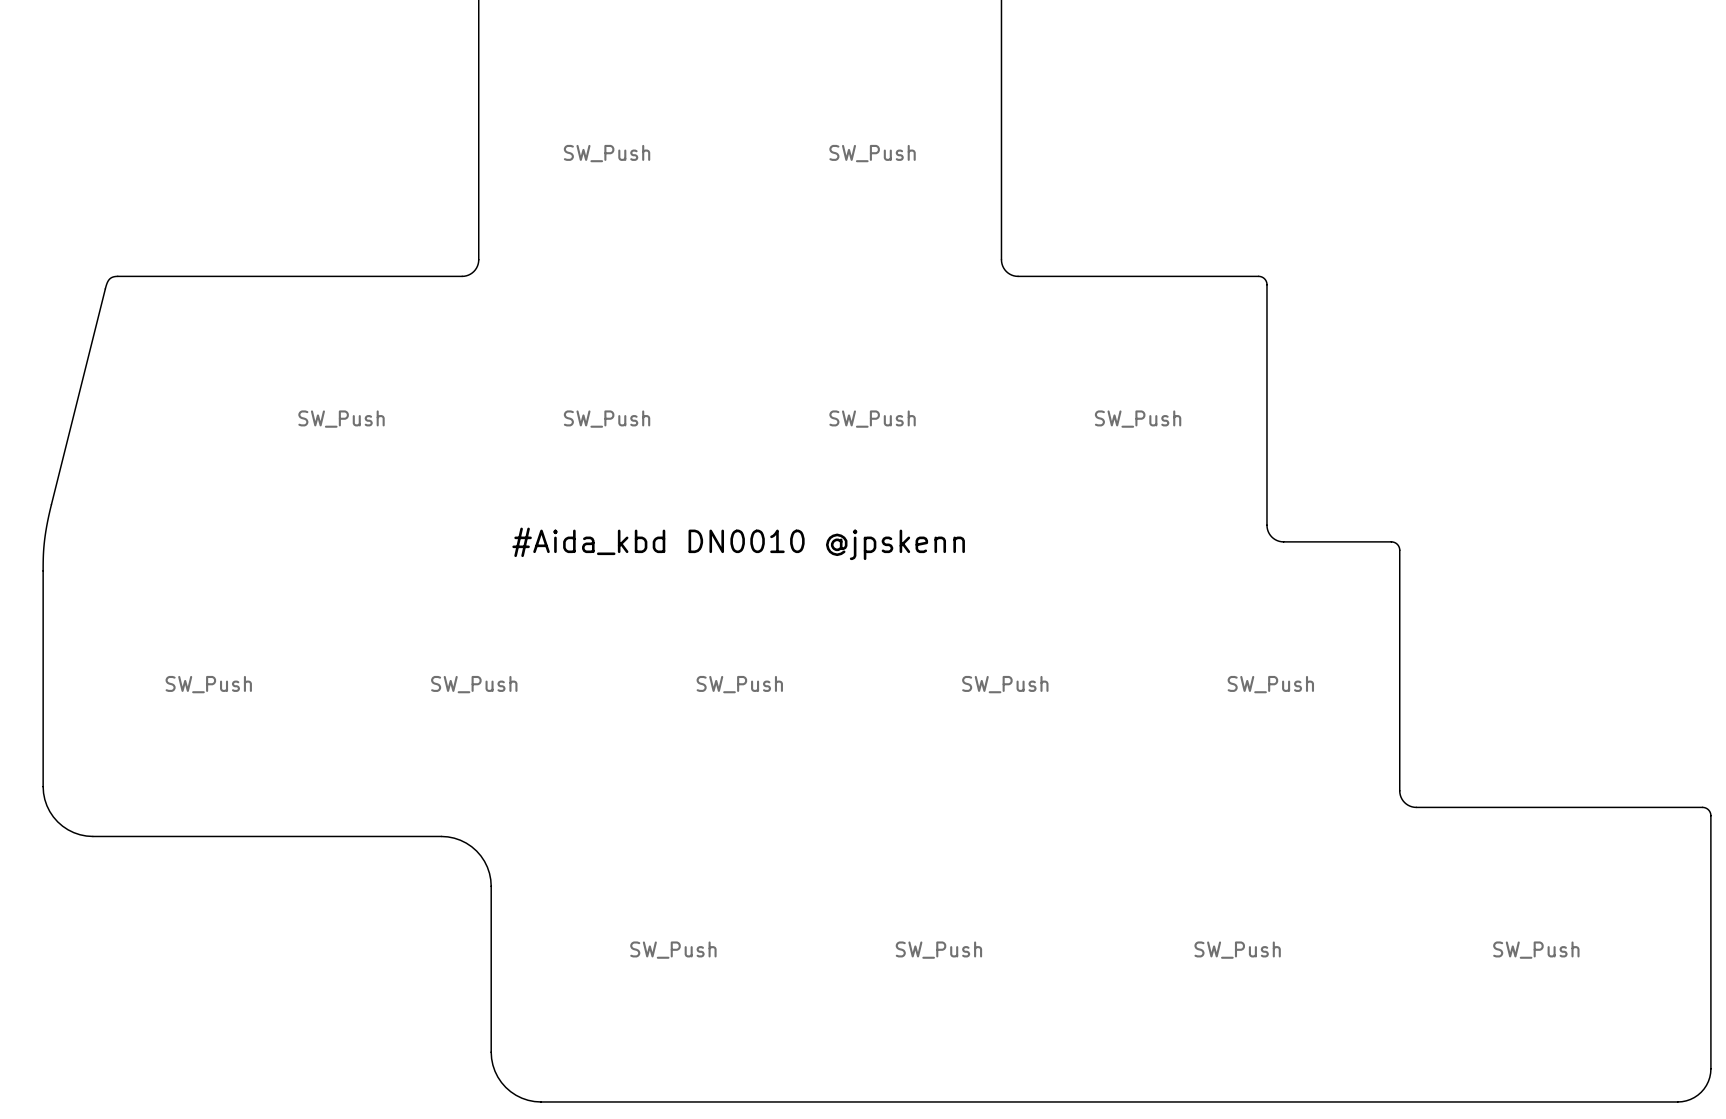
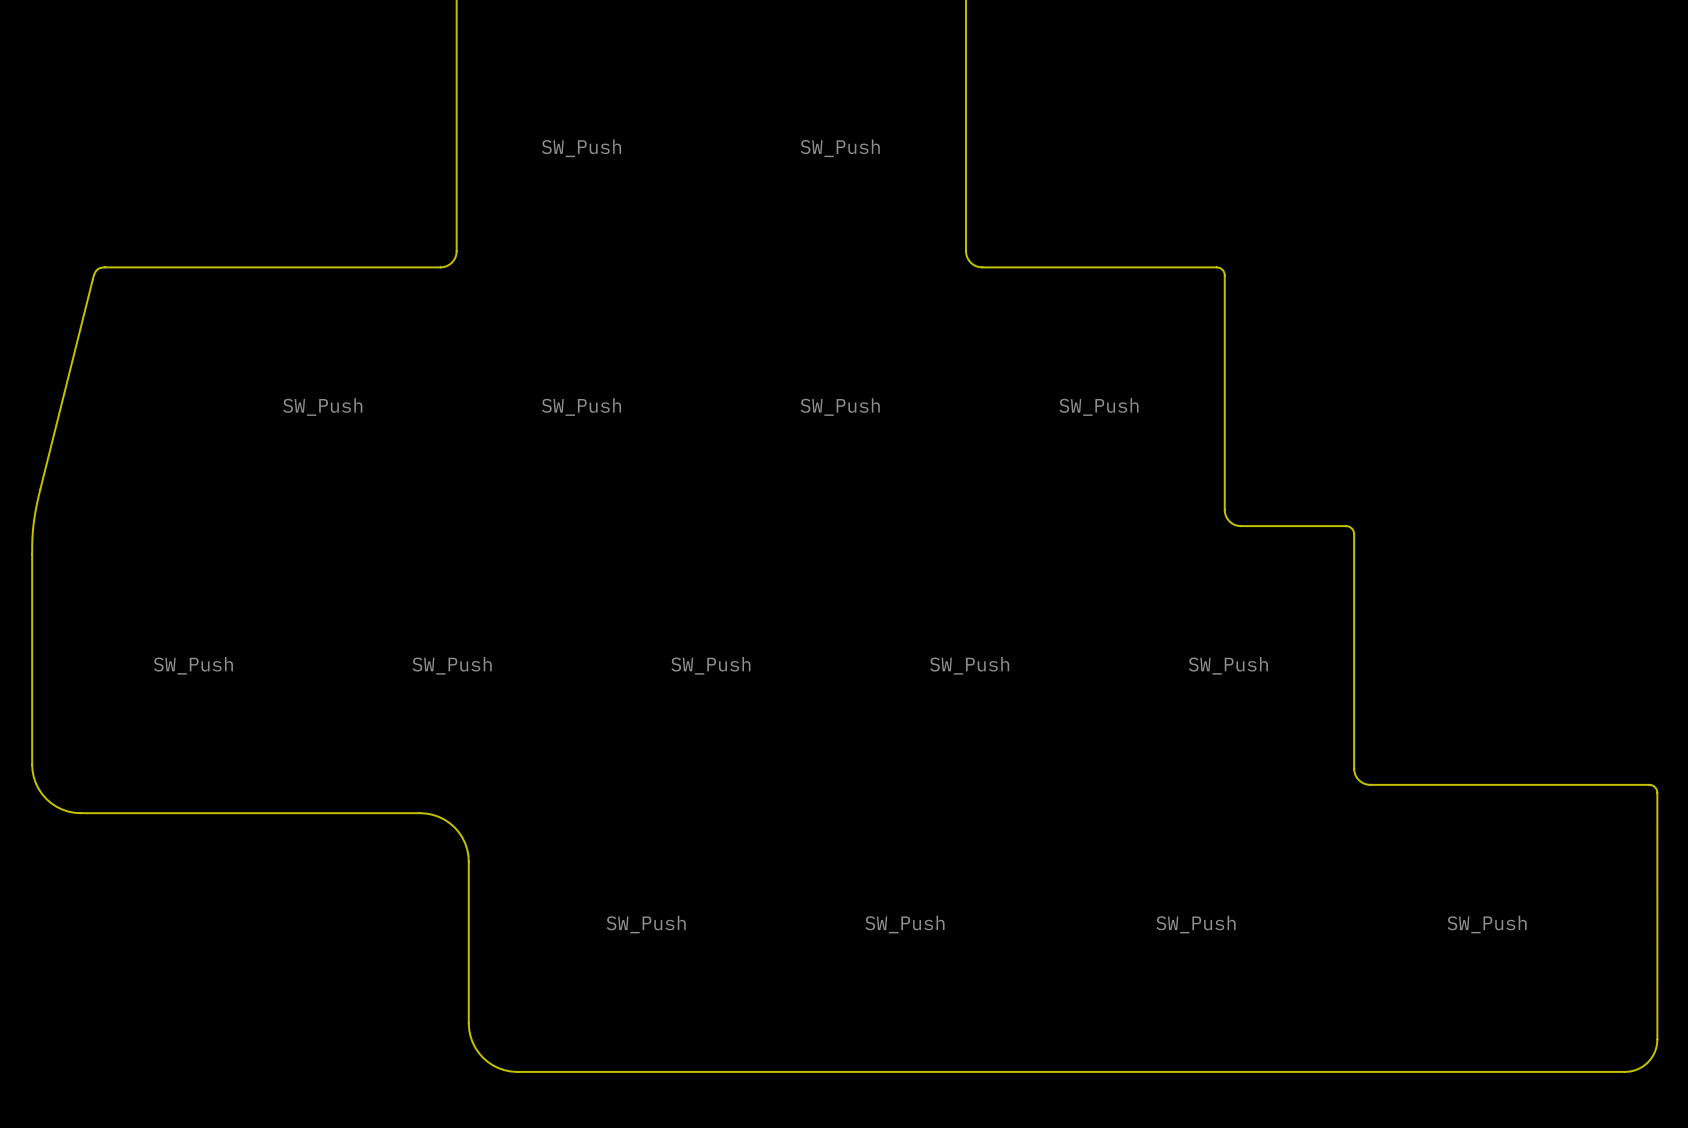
text: #Aida_kbd DN0010 @jpskenn (738, 543) -> none

